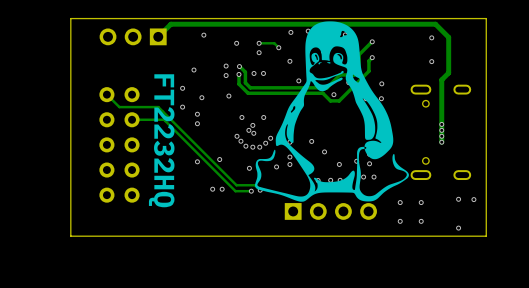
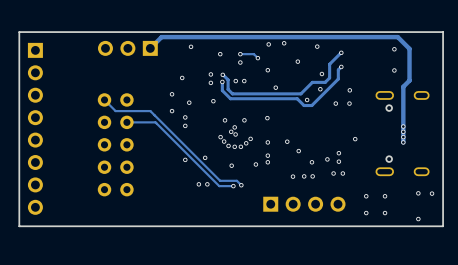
board edge: (70, 18) (70, 236) -> (72, 32) (19, 32) (19, 226) (72, 226)
drawing: [254, 21, 409, 202] -> none
part: none -> (35, 128)
text: FT2232HQ (161, 140) -> none

